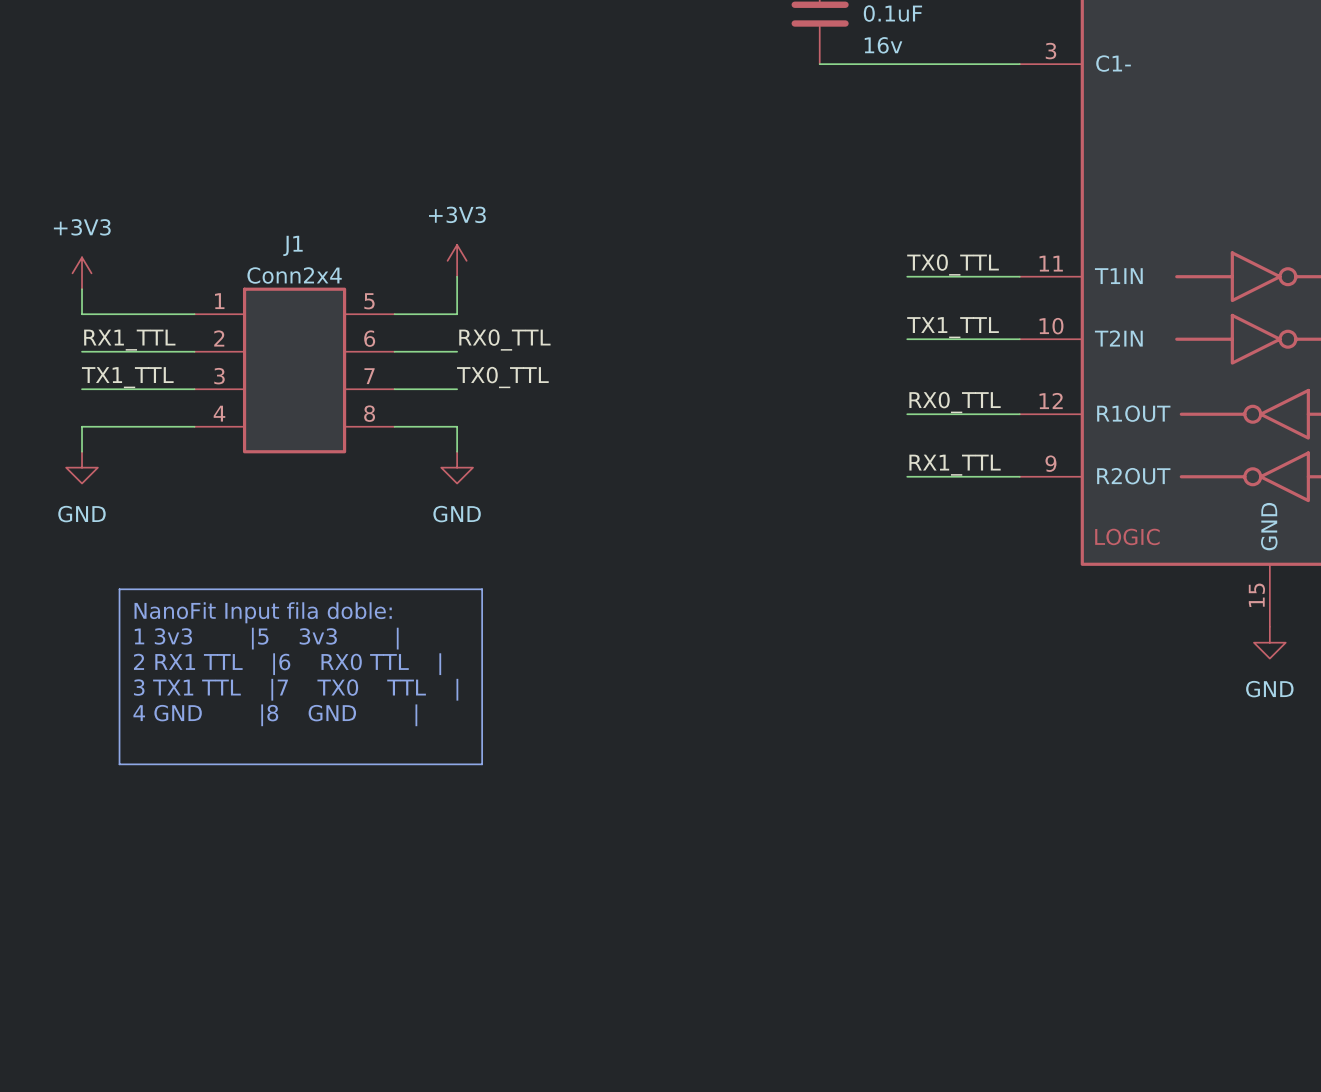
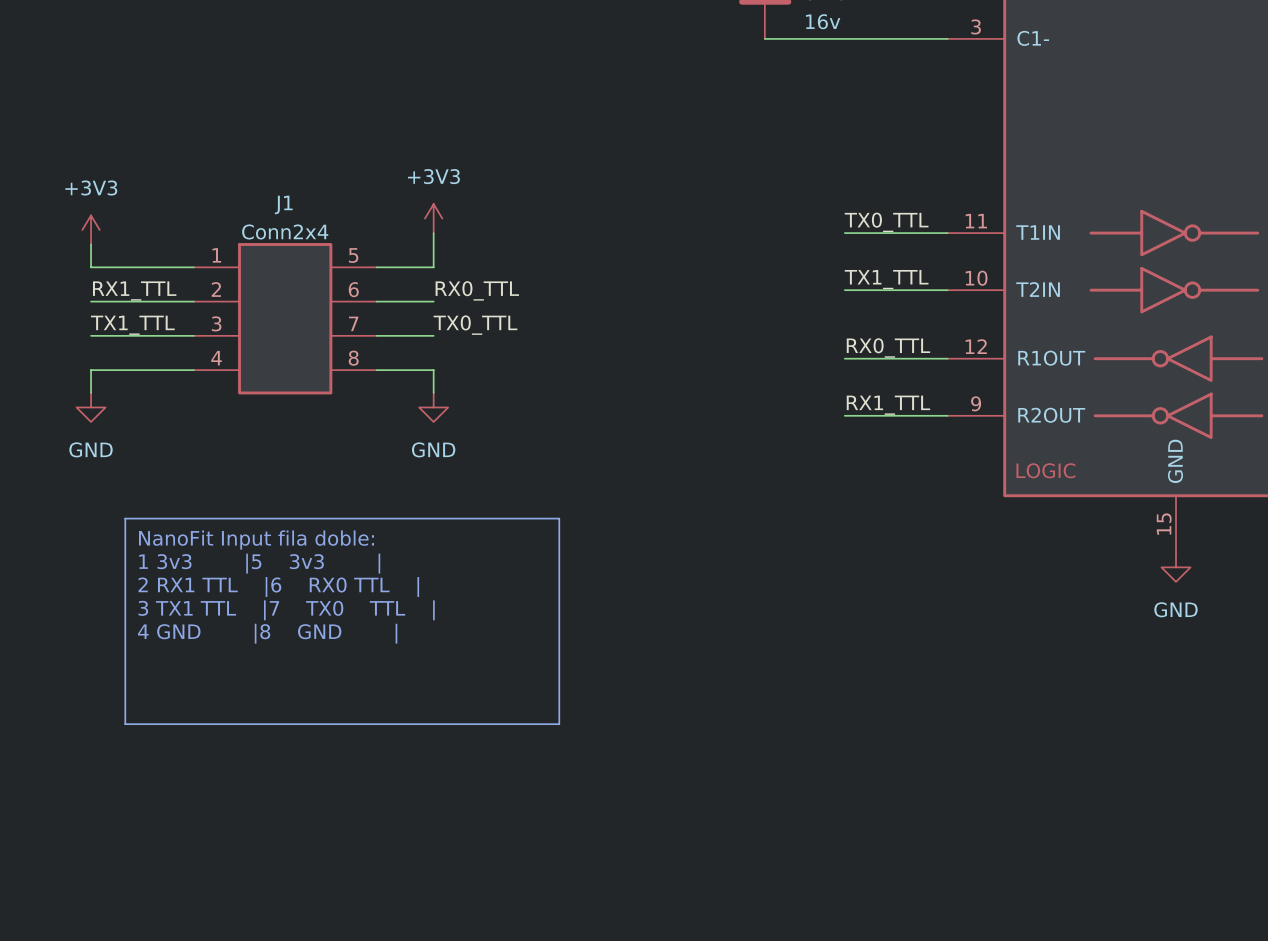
line: (482, 589) (482, 764) (119, 764) -> (456, 518) (559, 518) (559, 724) (125, 724) (125, 678)

